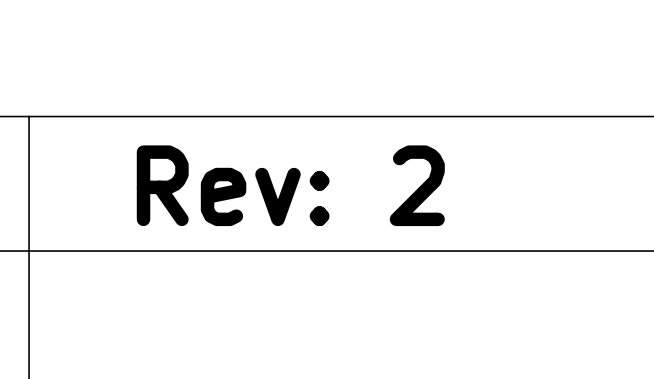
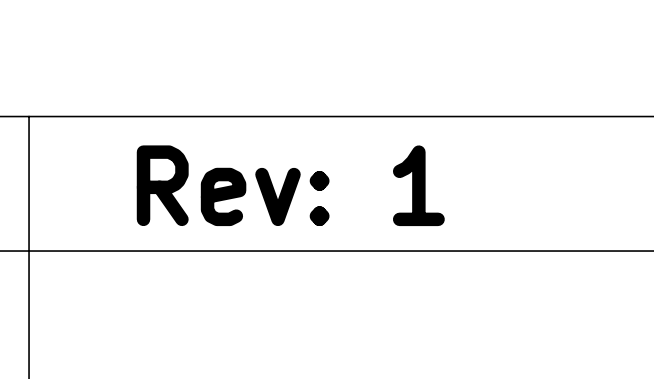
title block: Rev: 2 (290, 185) -> Rev: 1 (290, 185)

